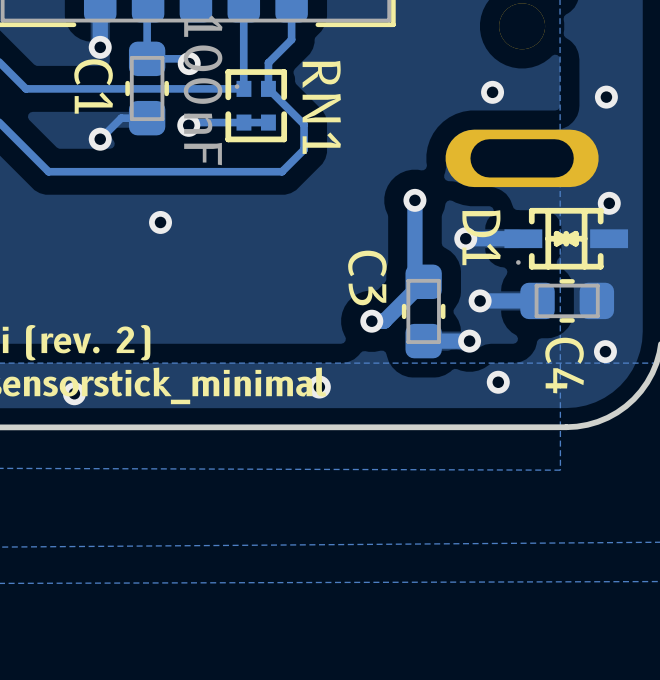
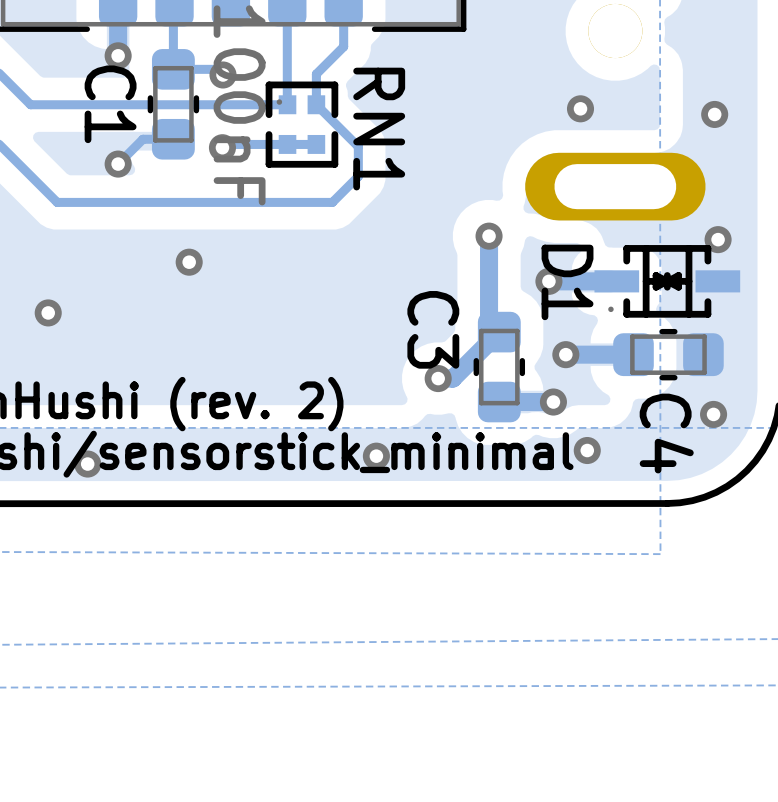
via: none -> (48, 312)

